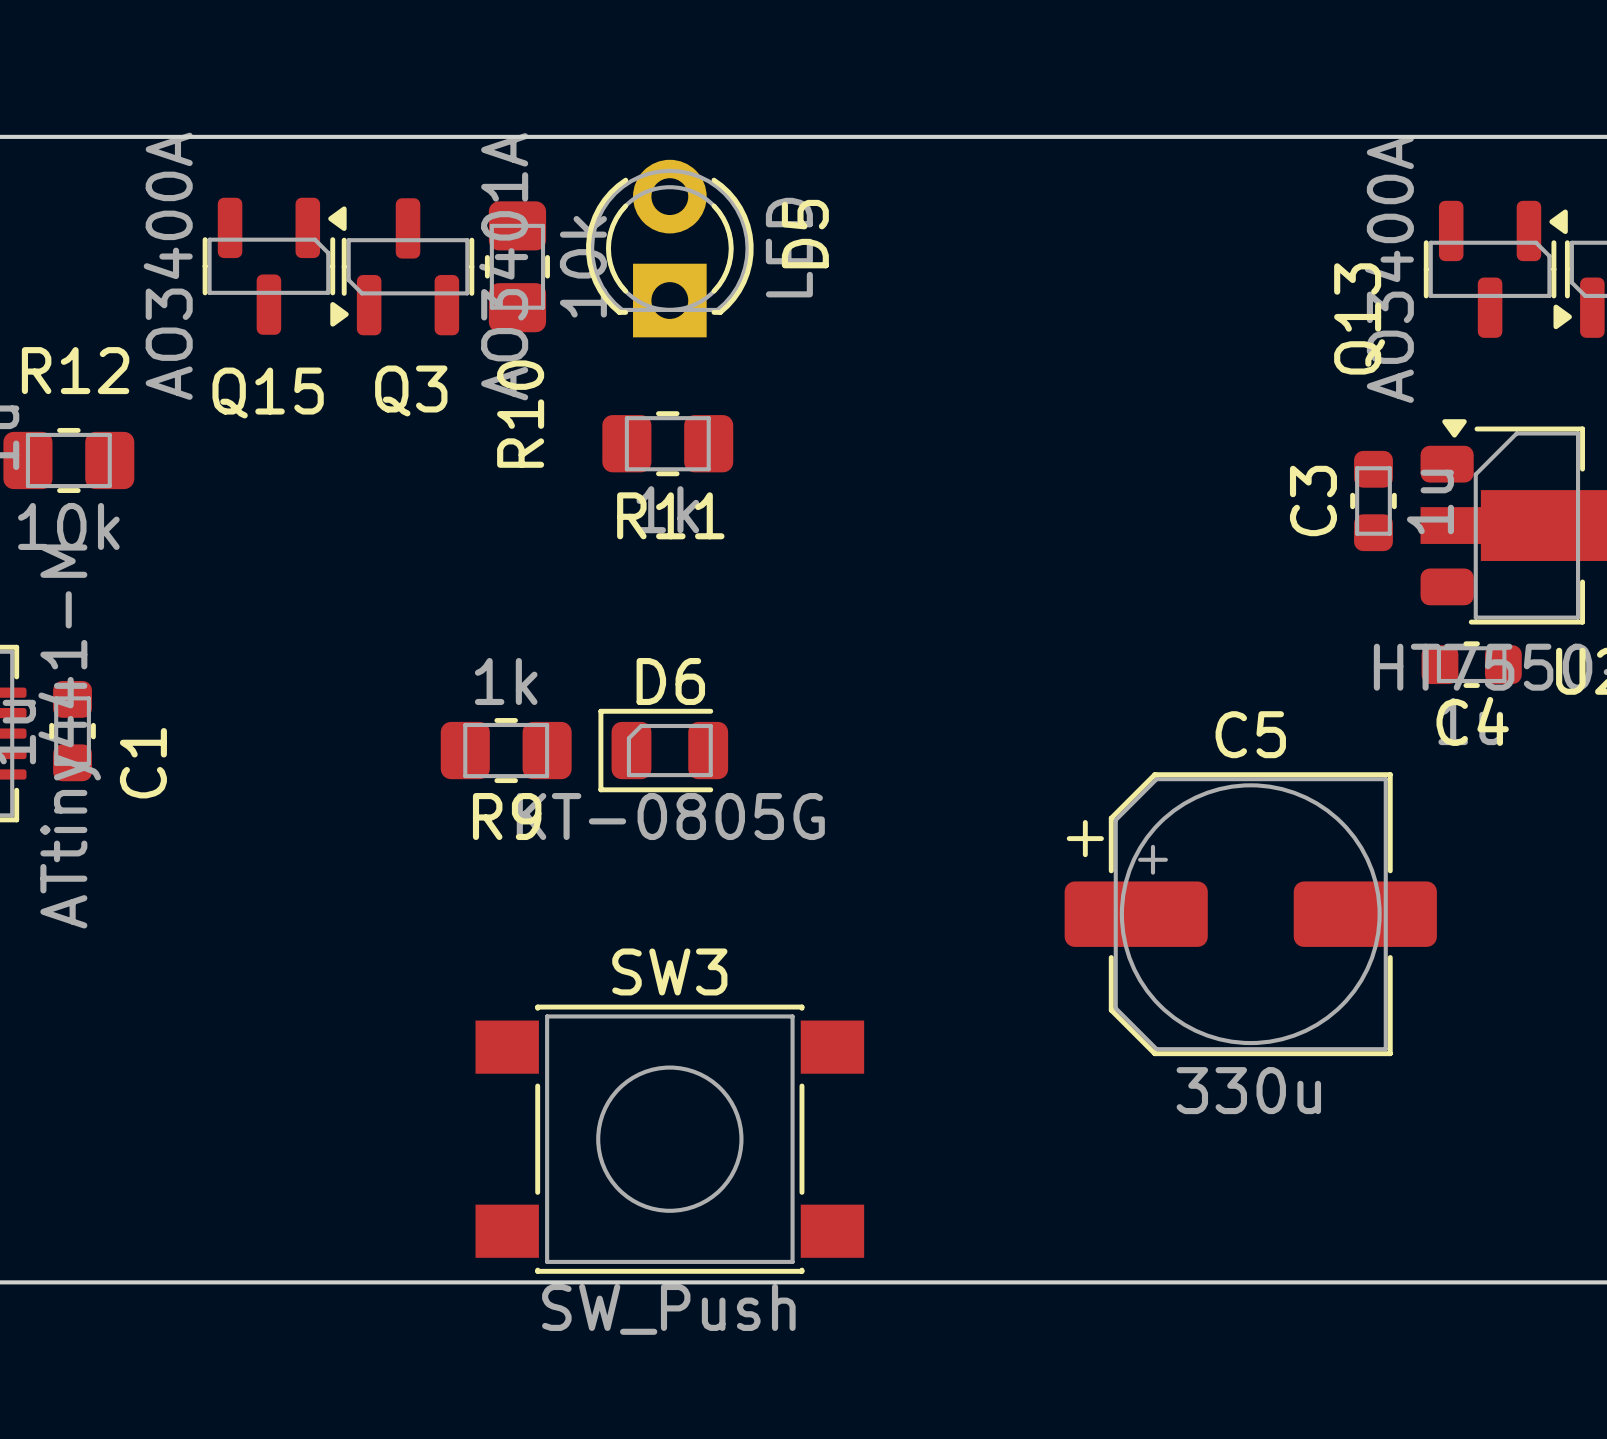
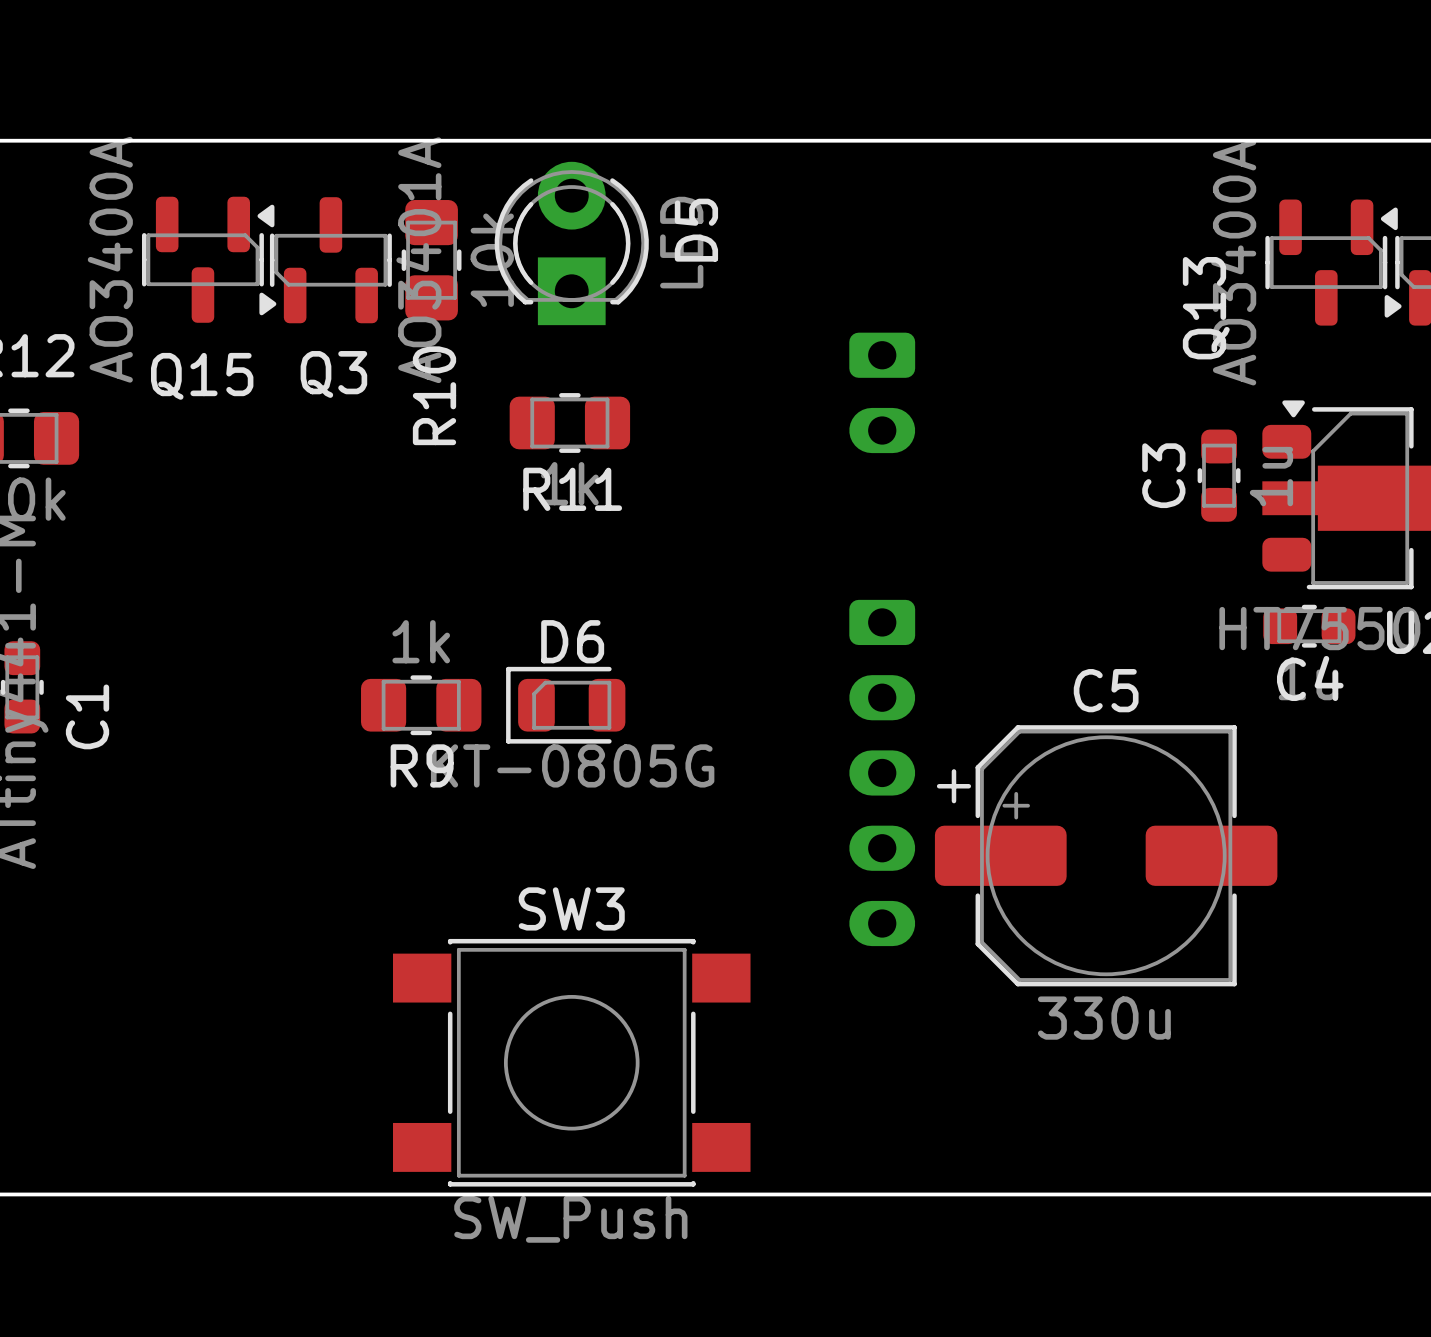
part: none -> (882, 392)
part: none -> (882, 772)

